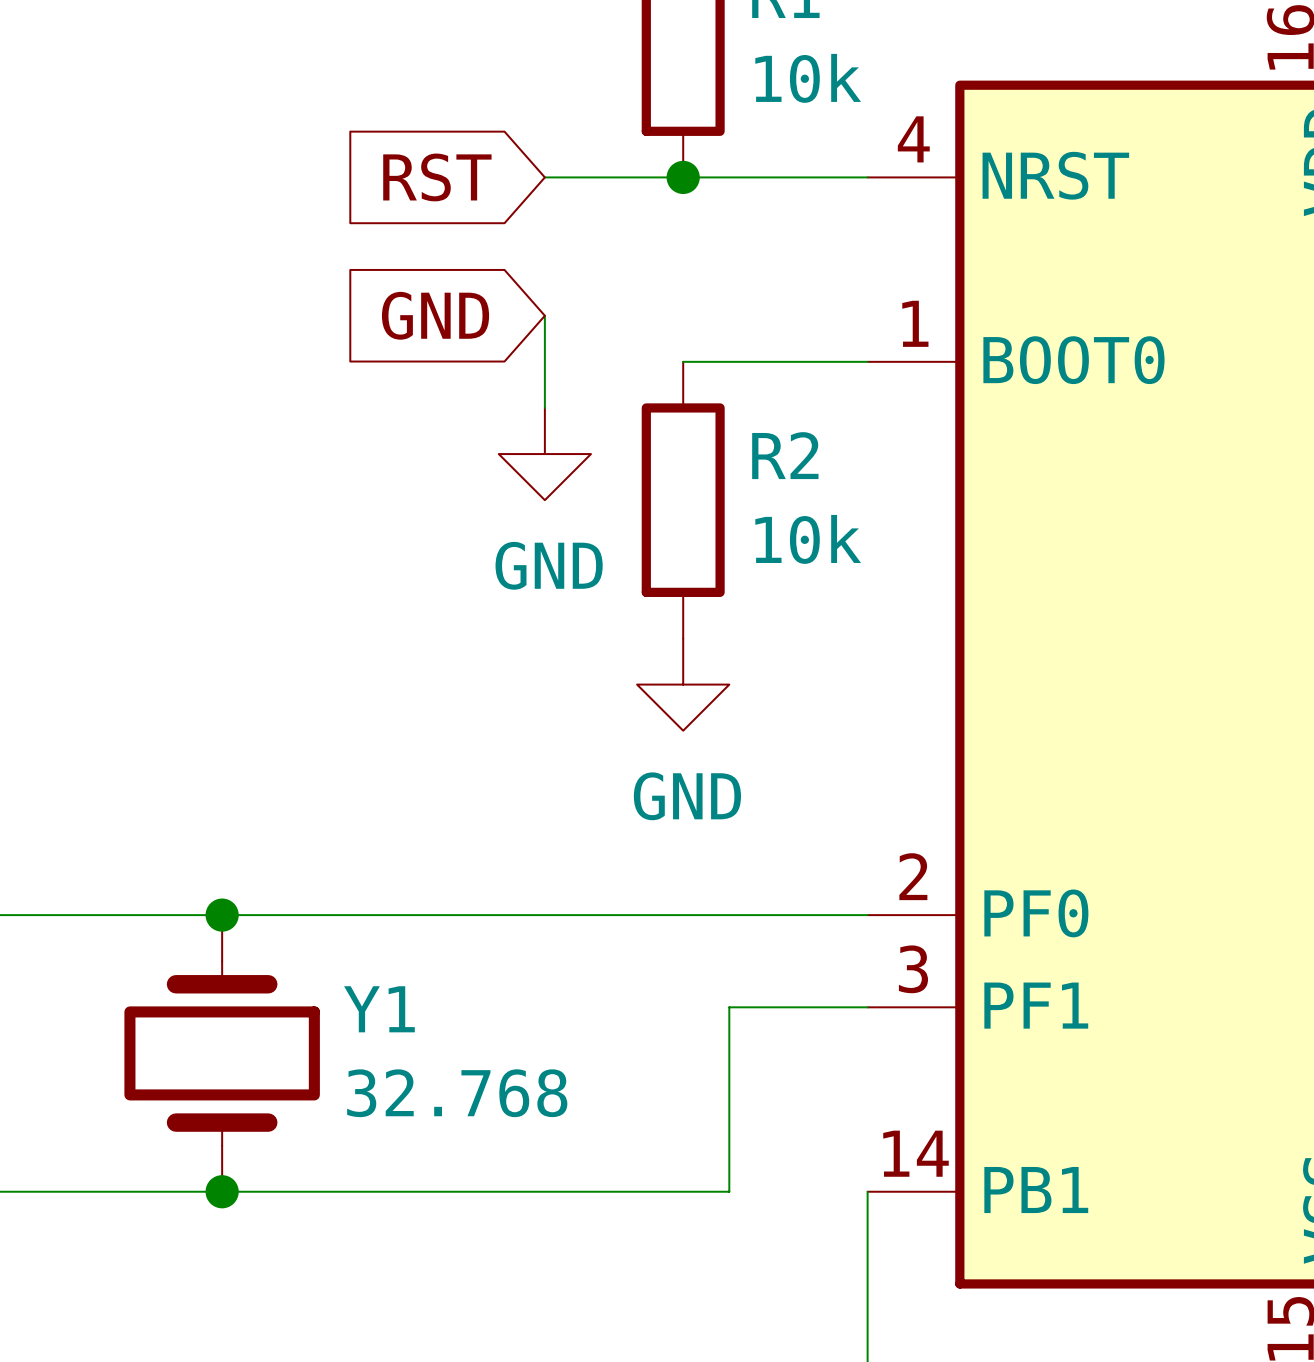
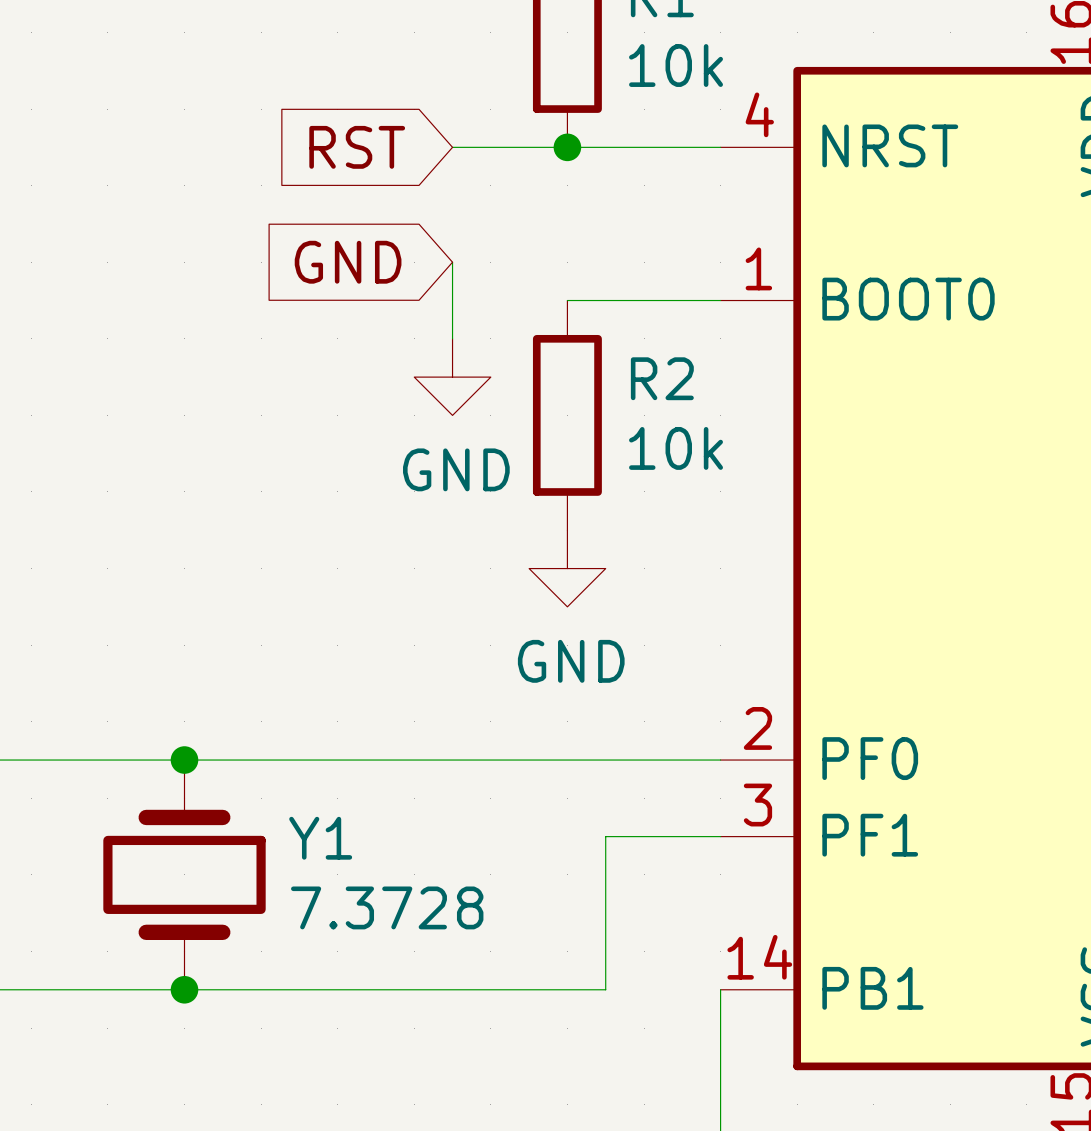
Y1 value: 32.768 (457, 1093) -> 7.3728 (387, 907)

